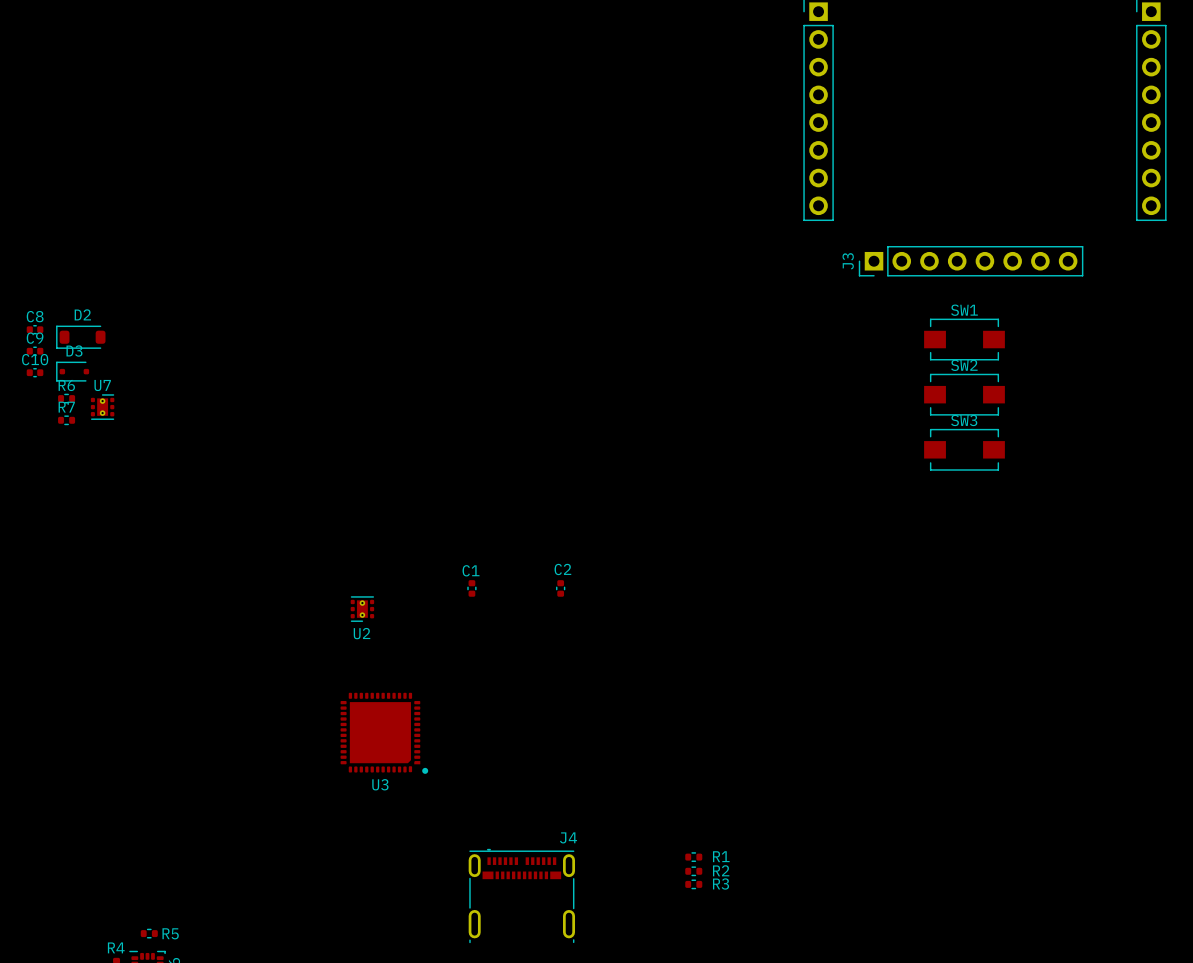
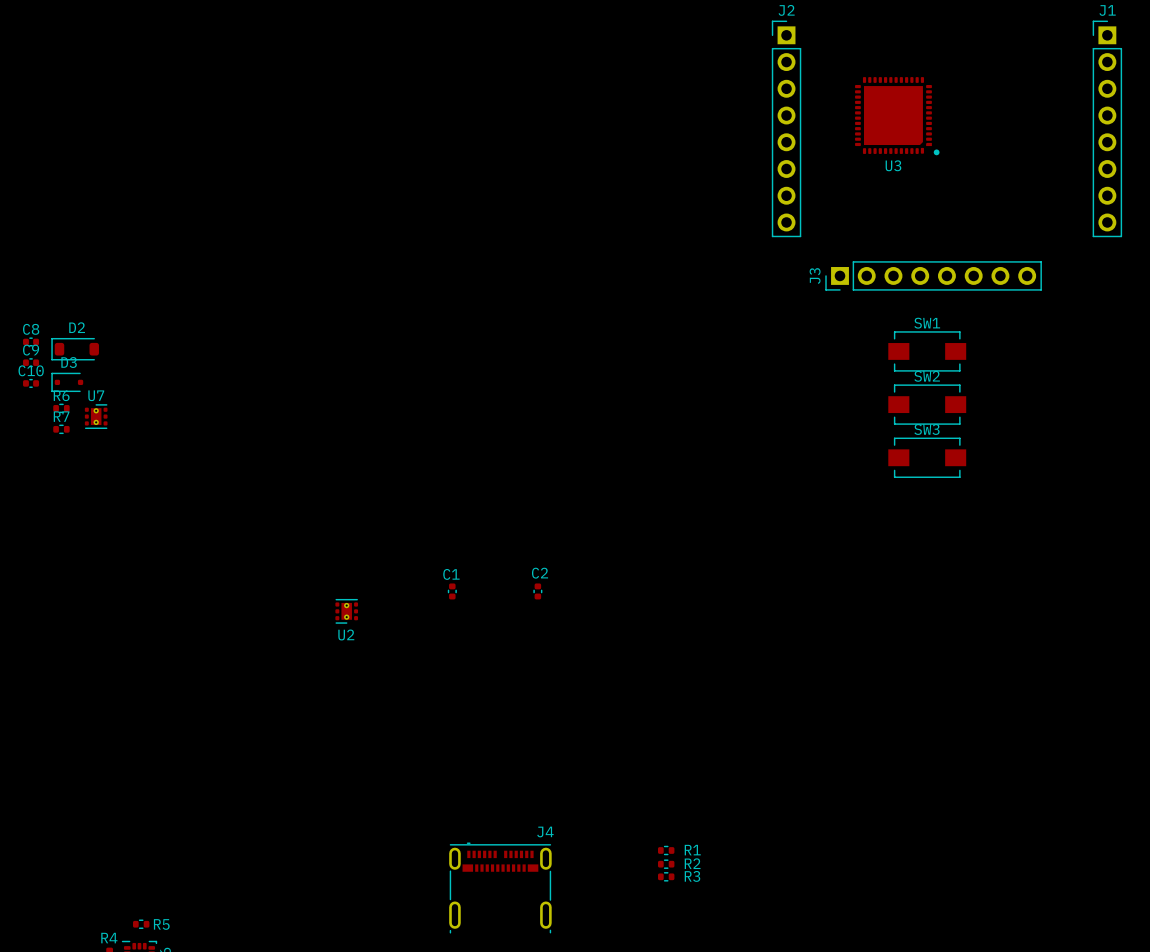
U3 position: (384, 733) -> (897, 116)

